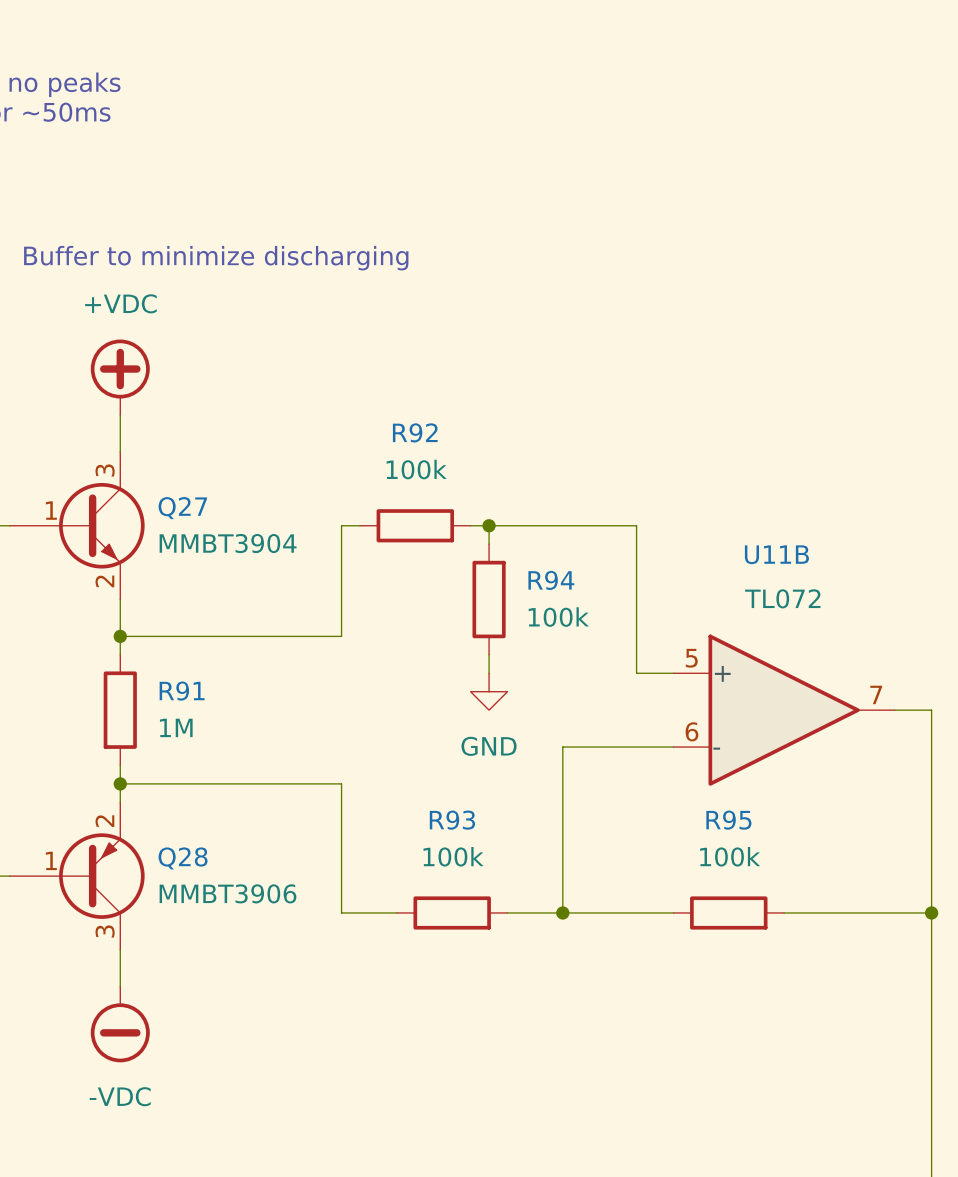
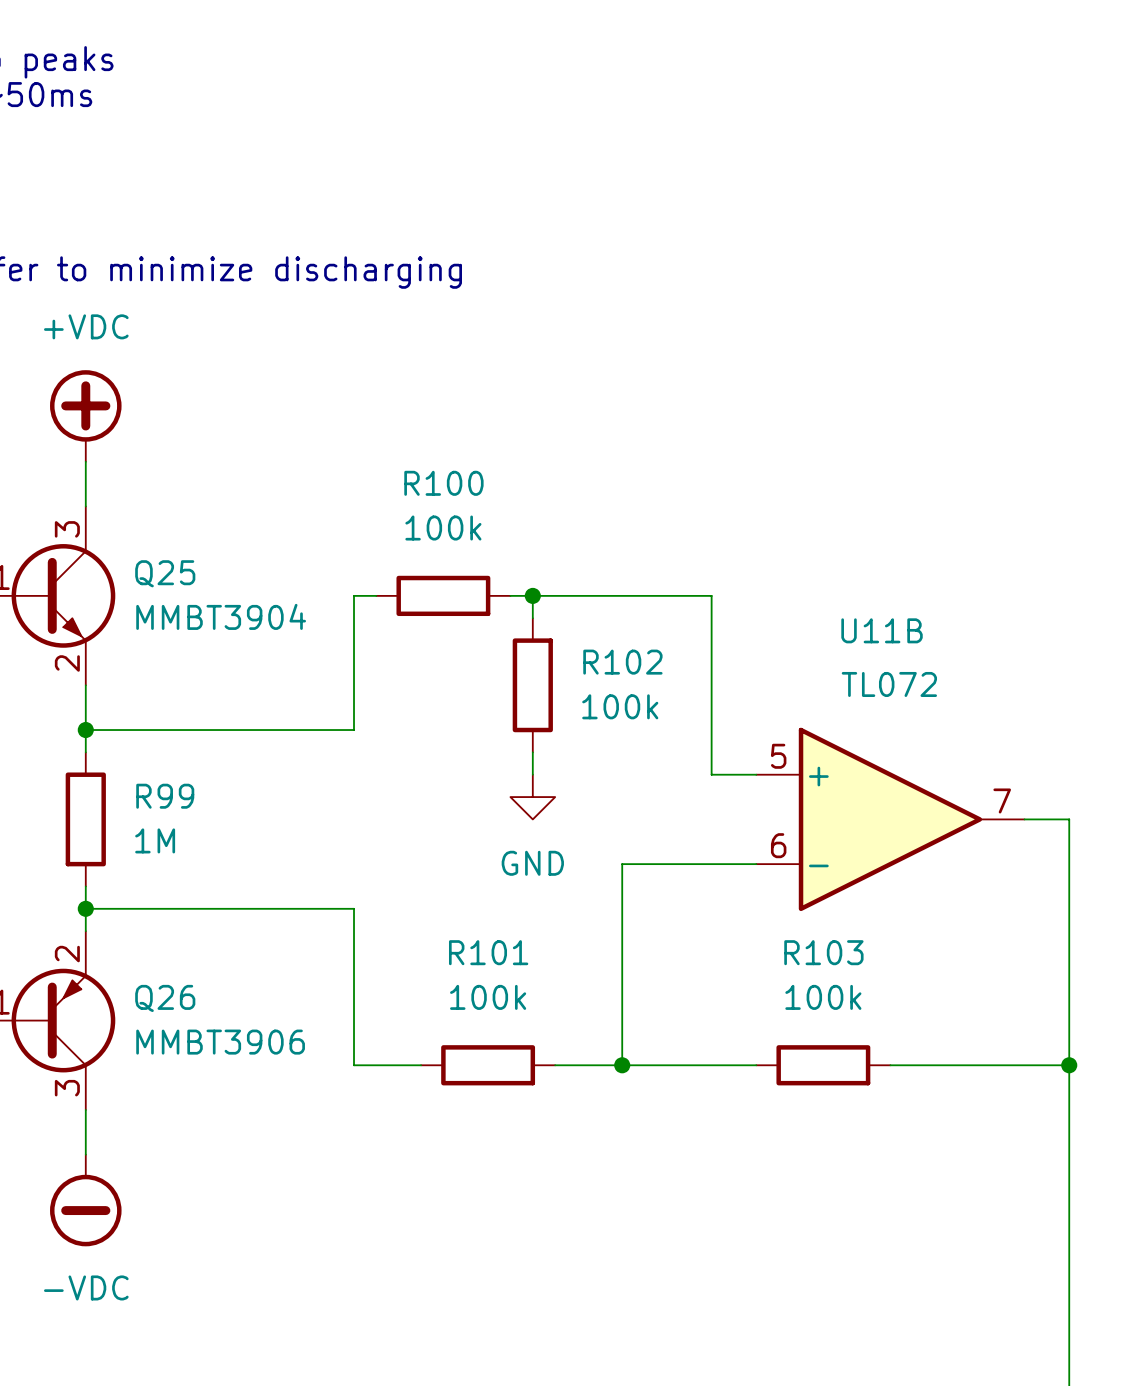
R92 name: R92 (415, 432) -> R100 (443, 483)
Q27 name: Q27 (182, 508) -> Q25 (165, 573)
R94 name: R94 (551, 580) -> R102 (622, 662)
R91 name: R91 (182, 691) -> R99 (165, 796)
R93 name: R93 (452, 820) -> R101 (488, 952)
R95 name: R95 (728, 820) -> R103 (823, 952)
Q28 name: Q28 (183, 858) -> Q26 (165, 998)

